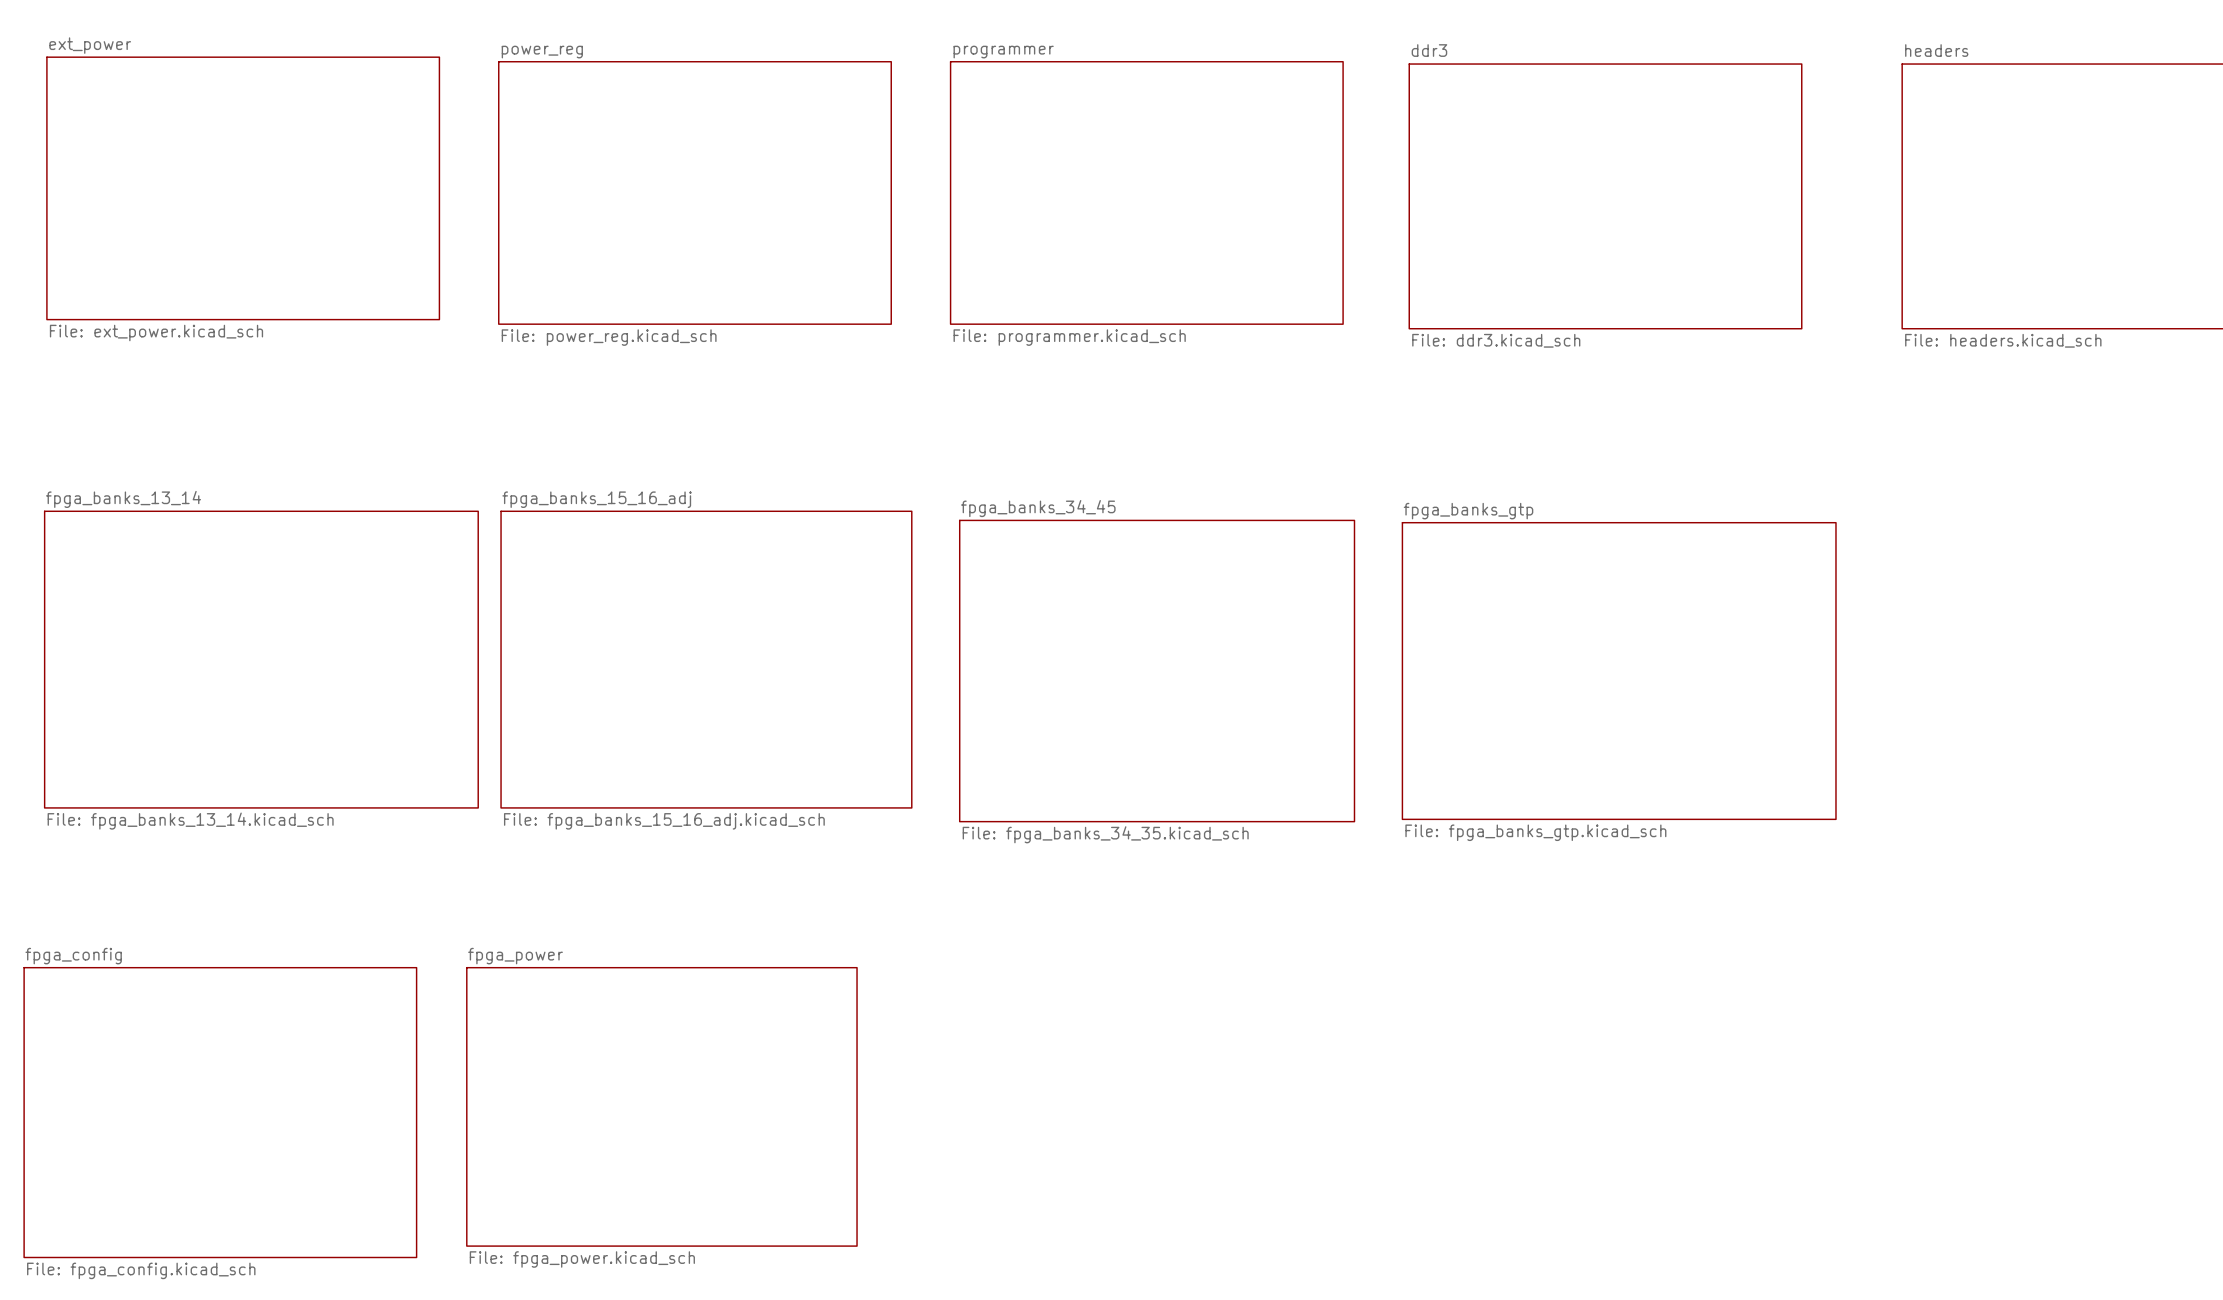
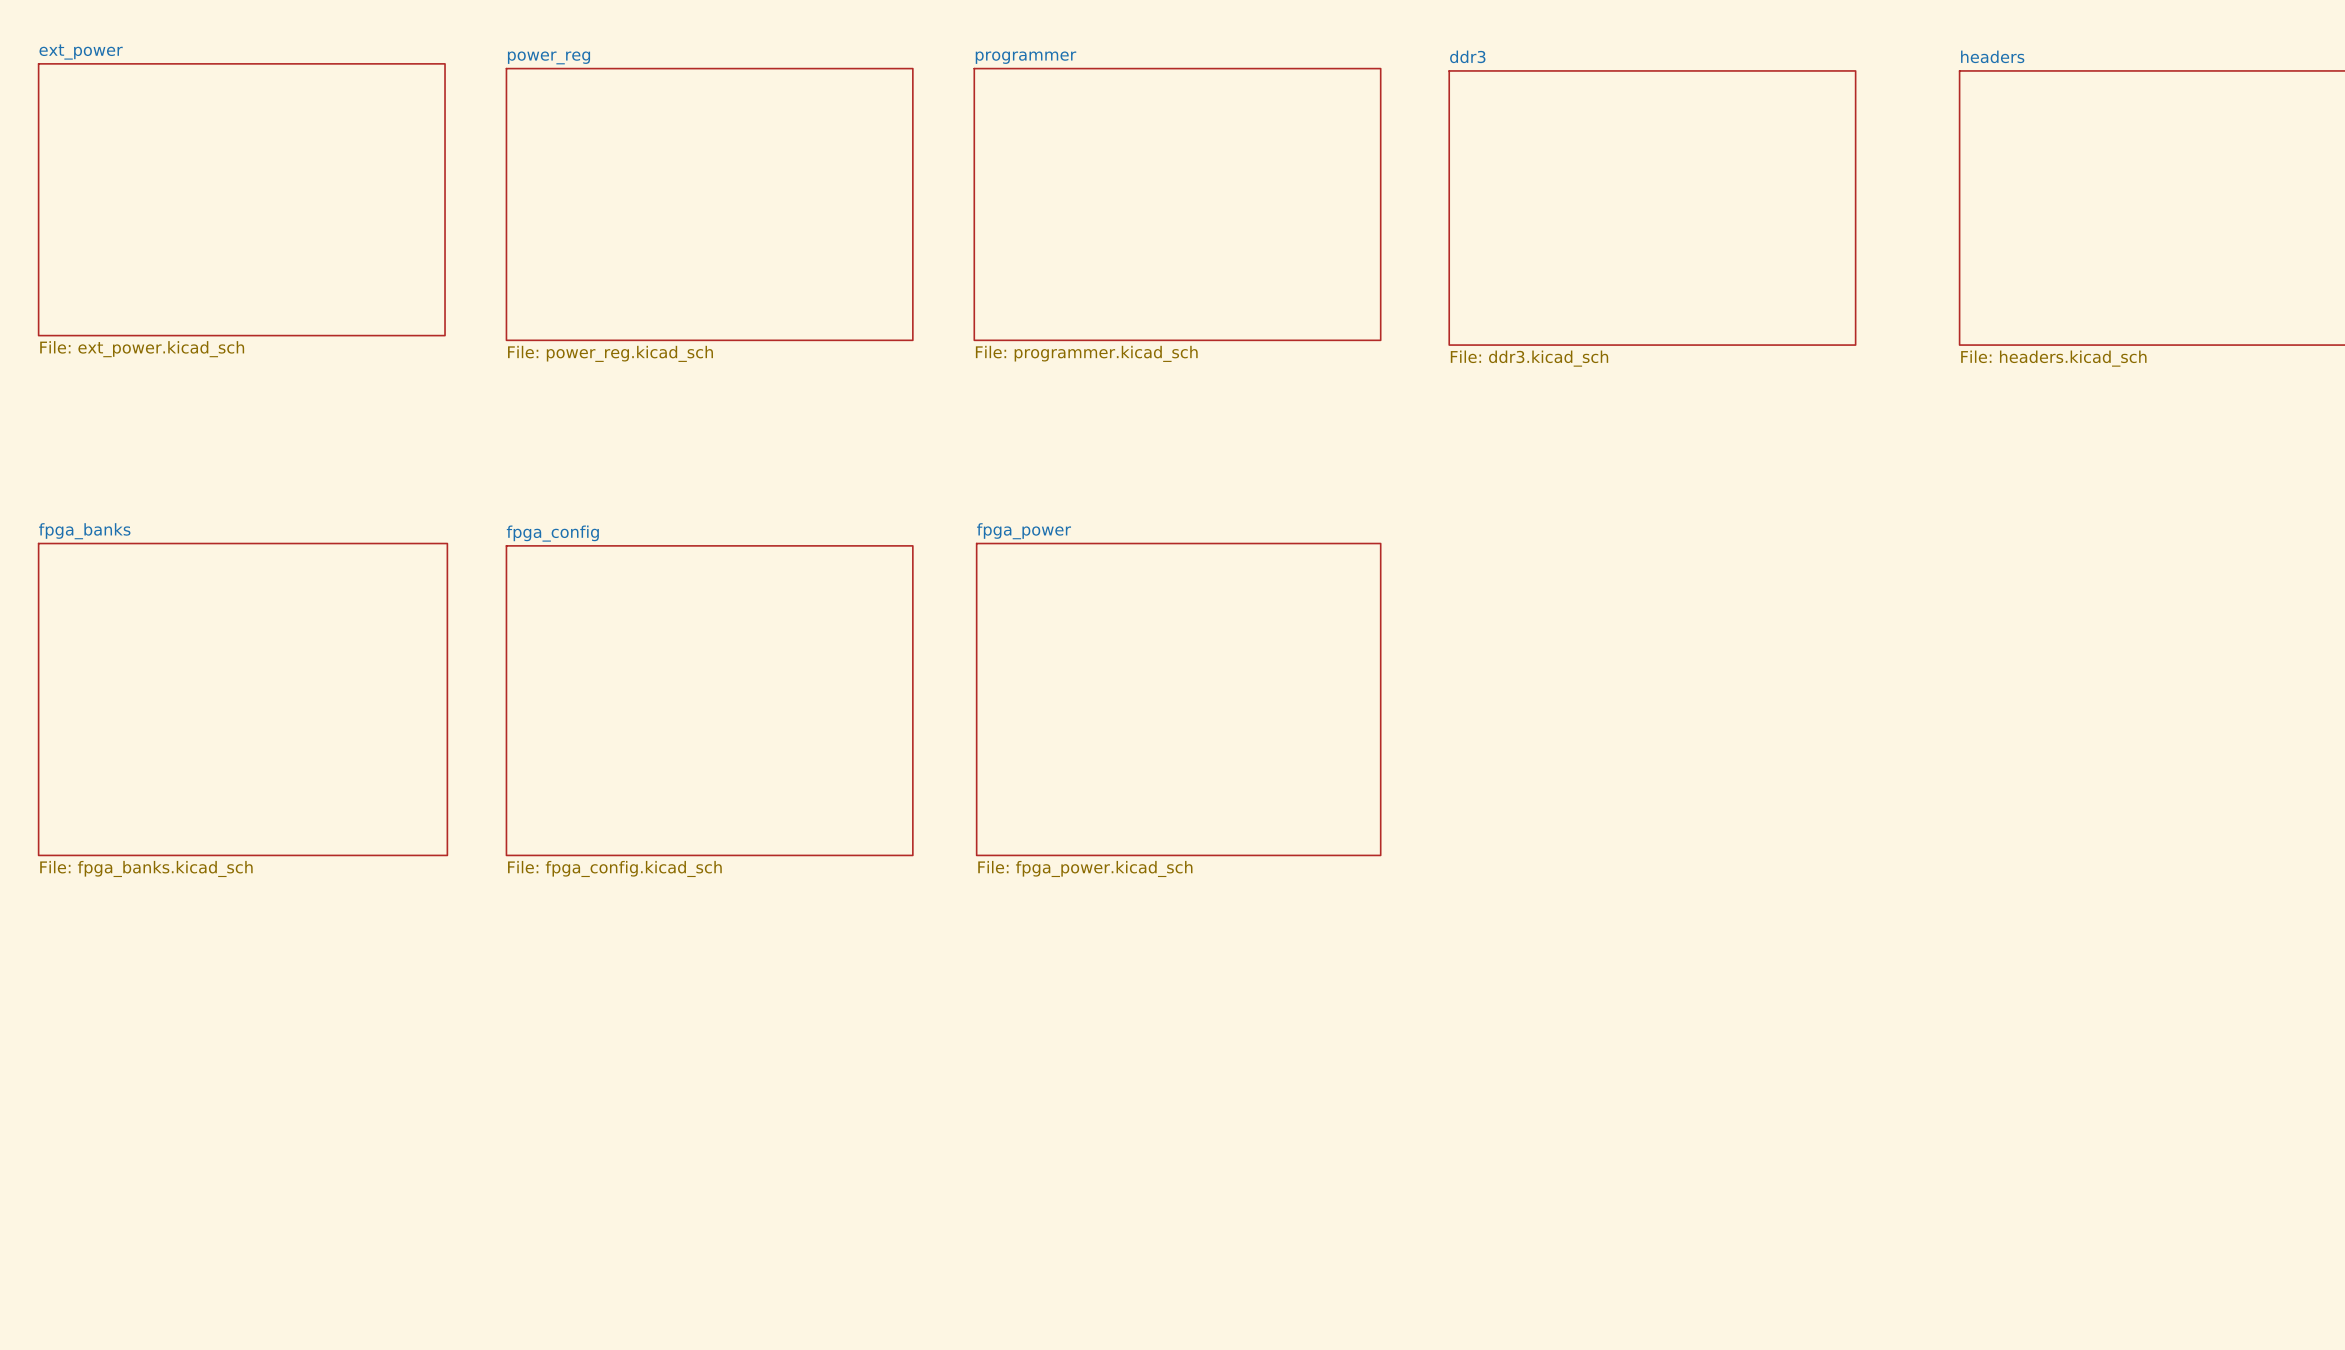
sheet fpga_banks_13_14: File: fpga_banks_13_14.kicad_sch (261, 659) -> none
sheet fpga_banks_15_16_adj: File: fpga_banks_15_16_adj.kicad_sch (706, 659) -> none
sheet fpga_banks: none -> File: fpga_banks.kicad_sch (242, 699)
sheet fpga_power: none -> File: fpga_power.kicad_sch (1178, 699)
sheet fpga_banks_34_45: File: fpga_banks_34_35.kicad_sch (1157, 671) -> none
sheet fpga_banks_gtp: File: fpga_banks_gtp.kicad_sch (1619, 671) -> none
sheet fpga_config: none -> File: fpga_config.kicad_sch (709, 700)
sheet fpga_power: File: fpga_power.kicad_sch (661, 1106) -> none
sheet fpga_config: File: fpga_config.kicad_sch (220, 1112) -> none

